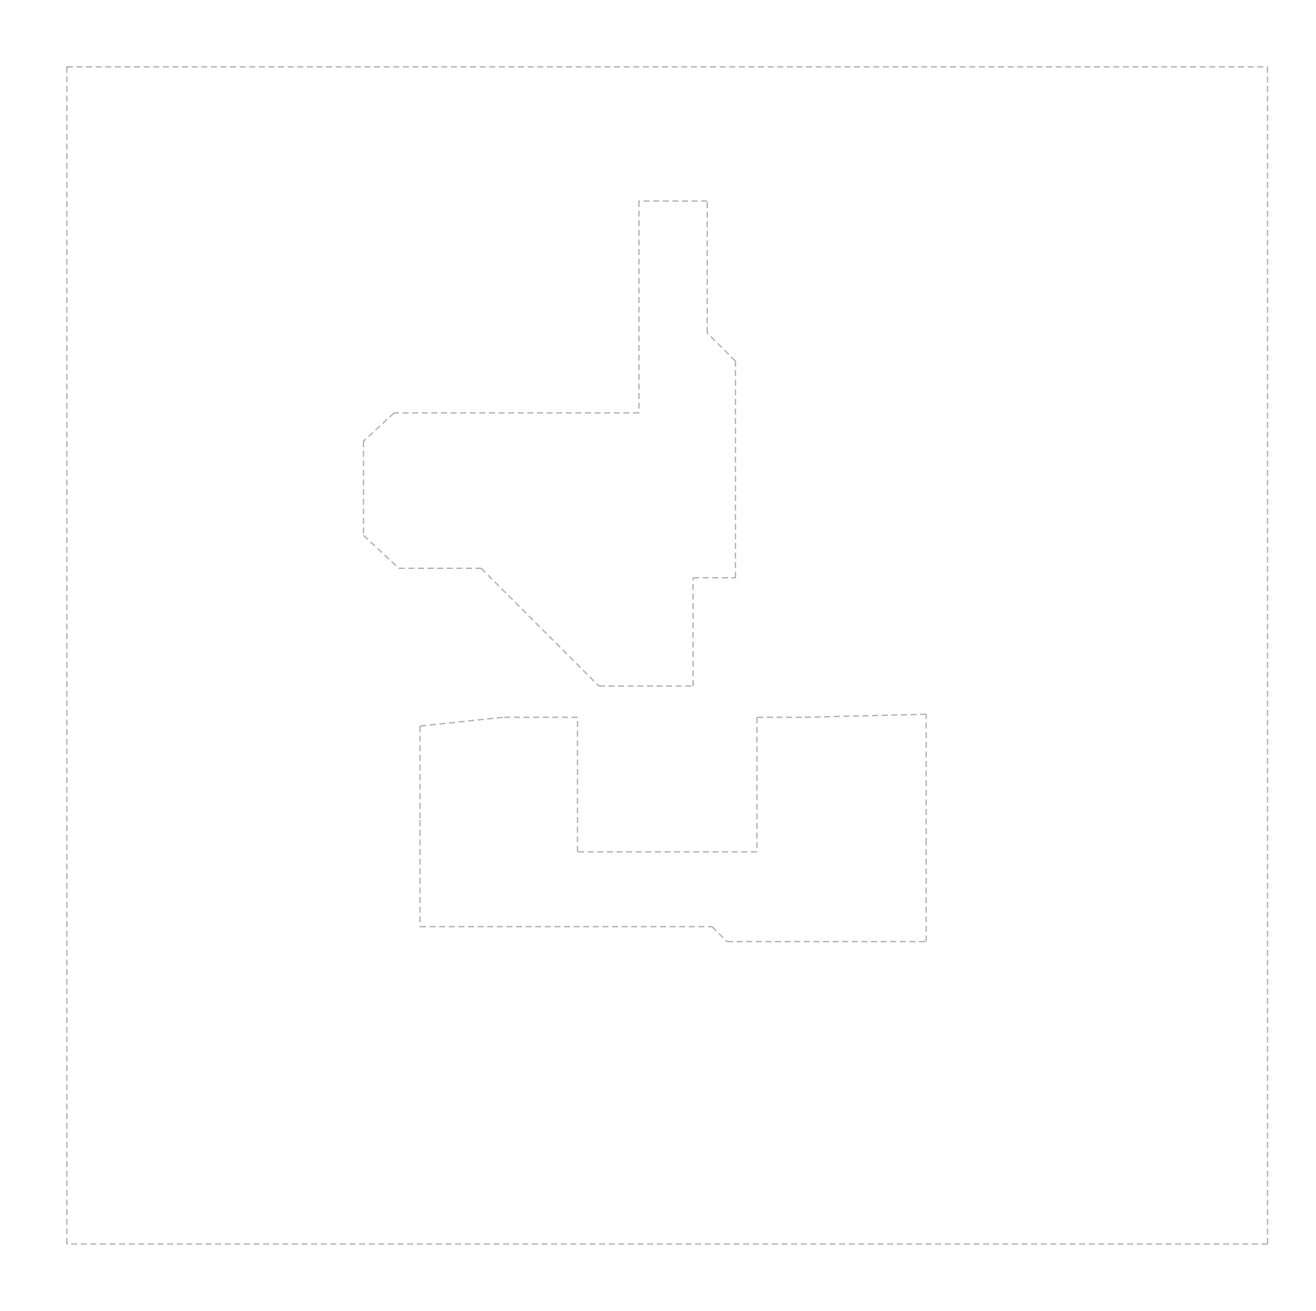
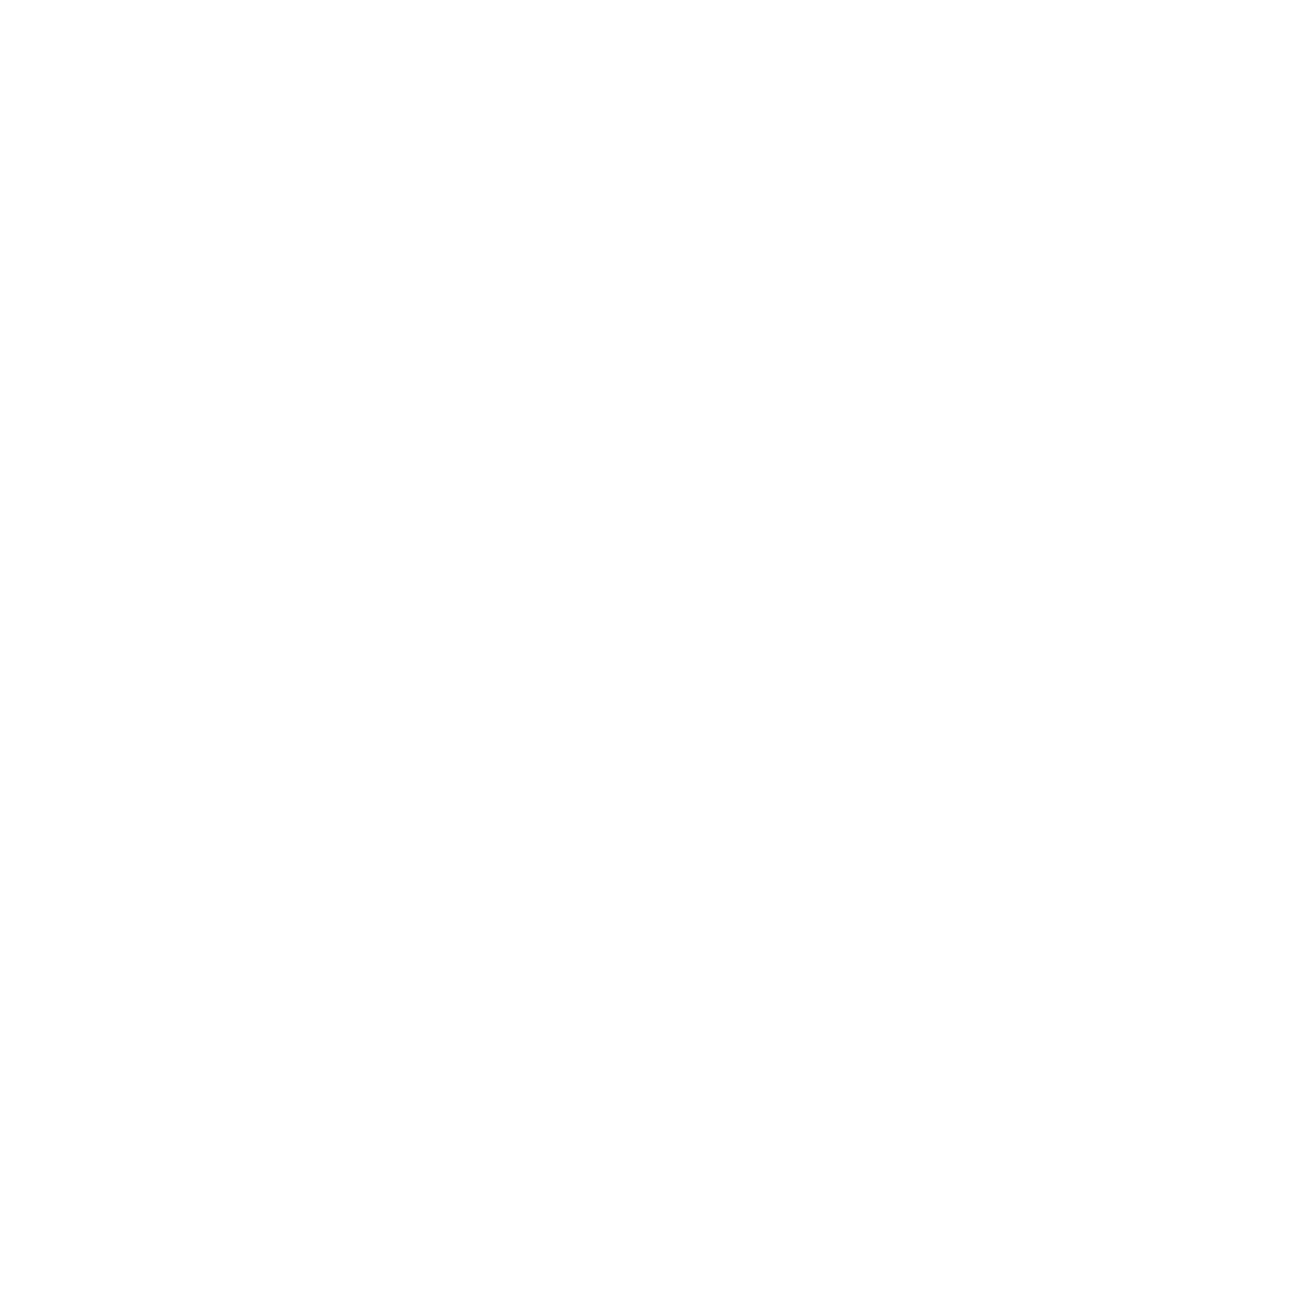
zone outline: (66, 66) (66, 1243) (1267, 1243) (1267, 66) (66, 66) -> none
zone outline: (638, 201) (638, 412) (394, 412) (363, 441) (363, 535) (398, 568) (481, 568) (598, 686) (693, 686) (693, 577) (735, 577) (735, 361) (707, 332) (707, 201) (638, 201) -> none
zone outline: (926, 714) (756, 717) (756, 851) (577, 851) (577, 717) (502, 717) (419, 726) (419, 926) (712, 926) (726, 941) (926, 941) (926, 714) -> none

